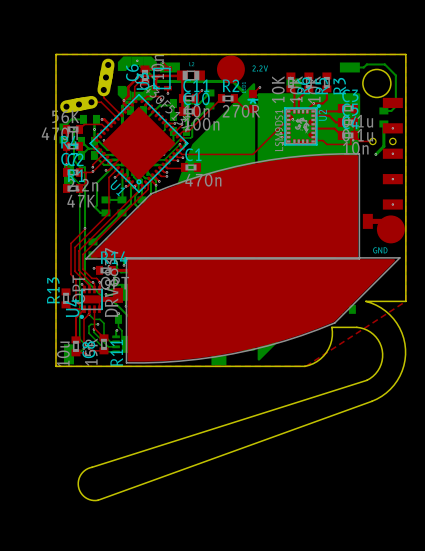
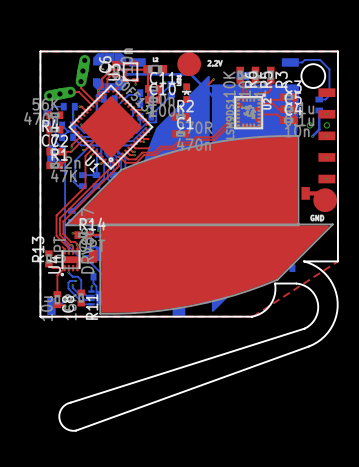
top track: (146, 96) (158, 96) (161, 99) -> none
top track: (221, 98) (188, 131) (182, 131) (178, 135) -> none
R2 position: (227, 98) -> (180, 116)
top track: (234, 98) (244, 108) (252, 108) -> none
part position: (252, 101) -> (186, 93)
top track: (181, 124) (175, 132) -> none
top track: (288, 124) (283, 124) (252, 154) (181, 154) (178, 151) -> none
top track: (106, 128) (101, 124) (84, 124) (79, 129) -> none
top track: none -> (231, 118) (212, 137) (195, 137) (190, 142) (177, 142) (173, 146) (160, 146) (154, 152) (142, 152) (135, 159) (128, 159)
top track: none -> (232, 121) (214, 139) (197, 139) (192, 144) (178, 144) (174, 149) (161, 149) (156, 155) (144, 155) (136, 162) (125, 162)
top track: (316, 140) (323, 140) (326, 144) (350, 144) (350, 138) (354, 135) (360, 141) (372, 141) -> none
via: (182, 157) -> none
C1 position: (190, 167) -> (180, 133)
via: (159, 181) -> none
bottom track: (79, 183) (79, 339) (88, 348) -> none
via: (156, 185) -> none
top track: (84, 228) (70, 243) (70, 274) (75, 280) (75, 301) (84, 309) -> none
via: (84, 228) -> none
via: (81, 284) -> none
top track: (89, 309) (89, 313) (83, 319) (83, 348) -> none
top track: (94, 309) (94, 328) (103, 337) -> none
top track: (88, 348) (91, 350) (103, 350) -> none

